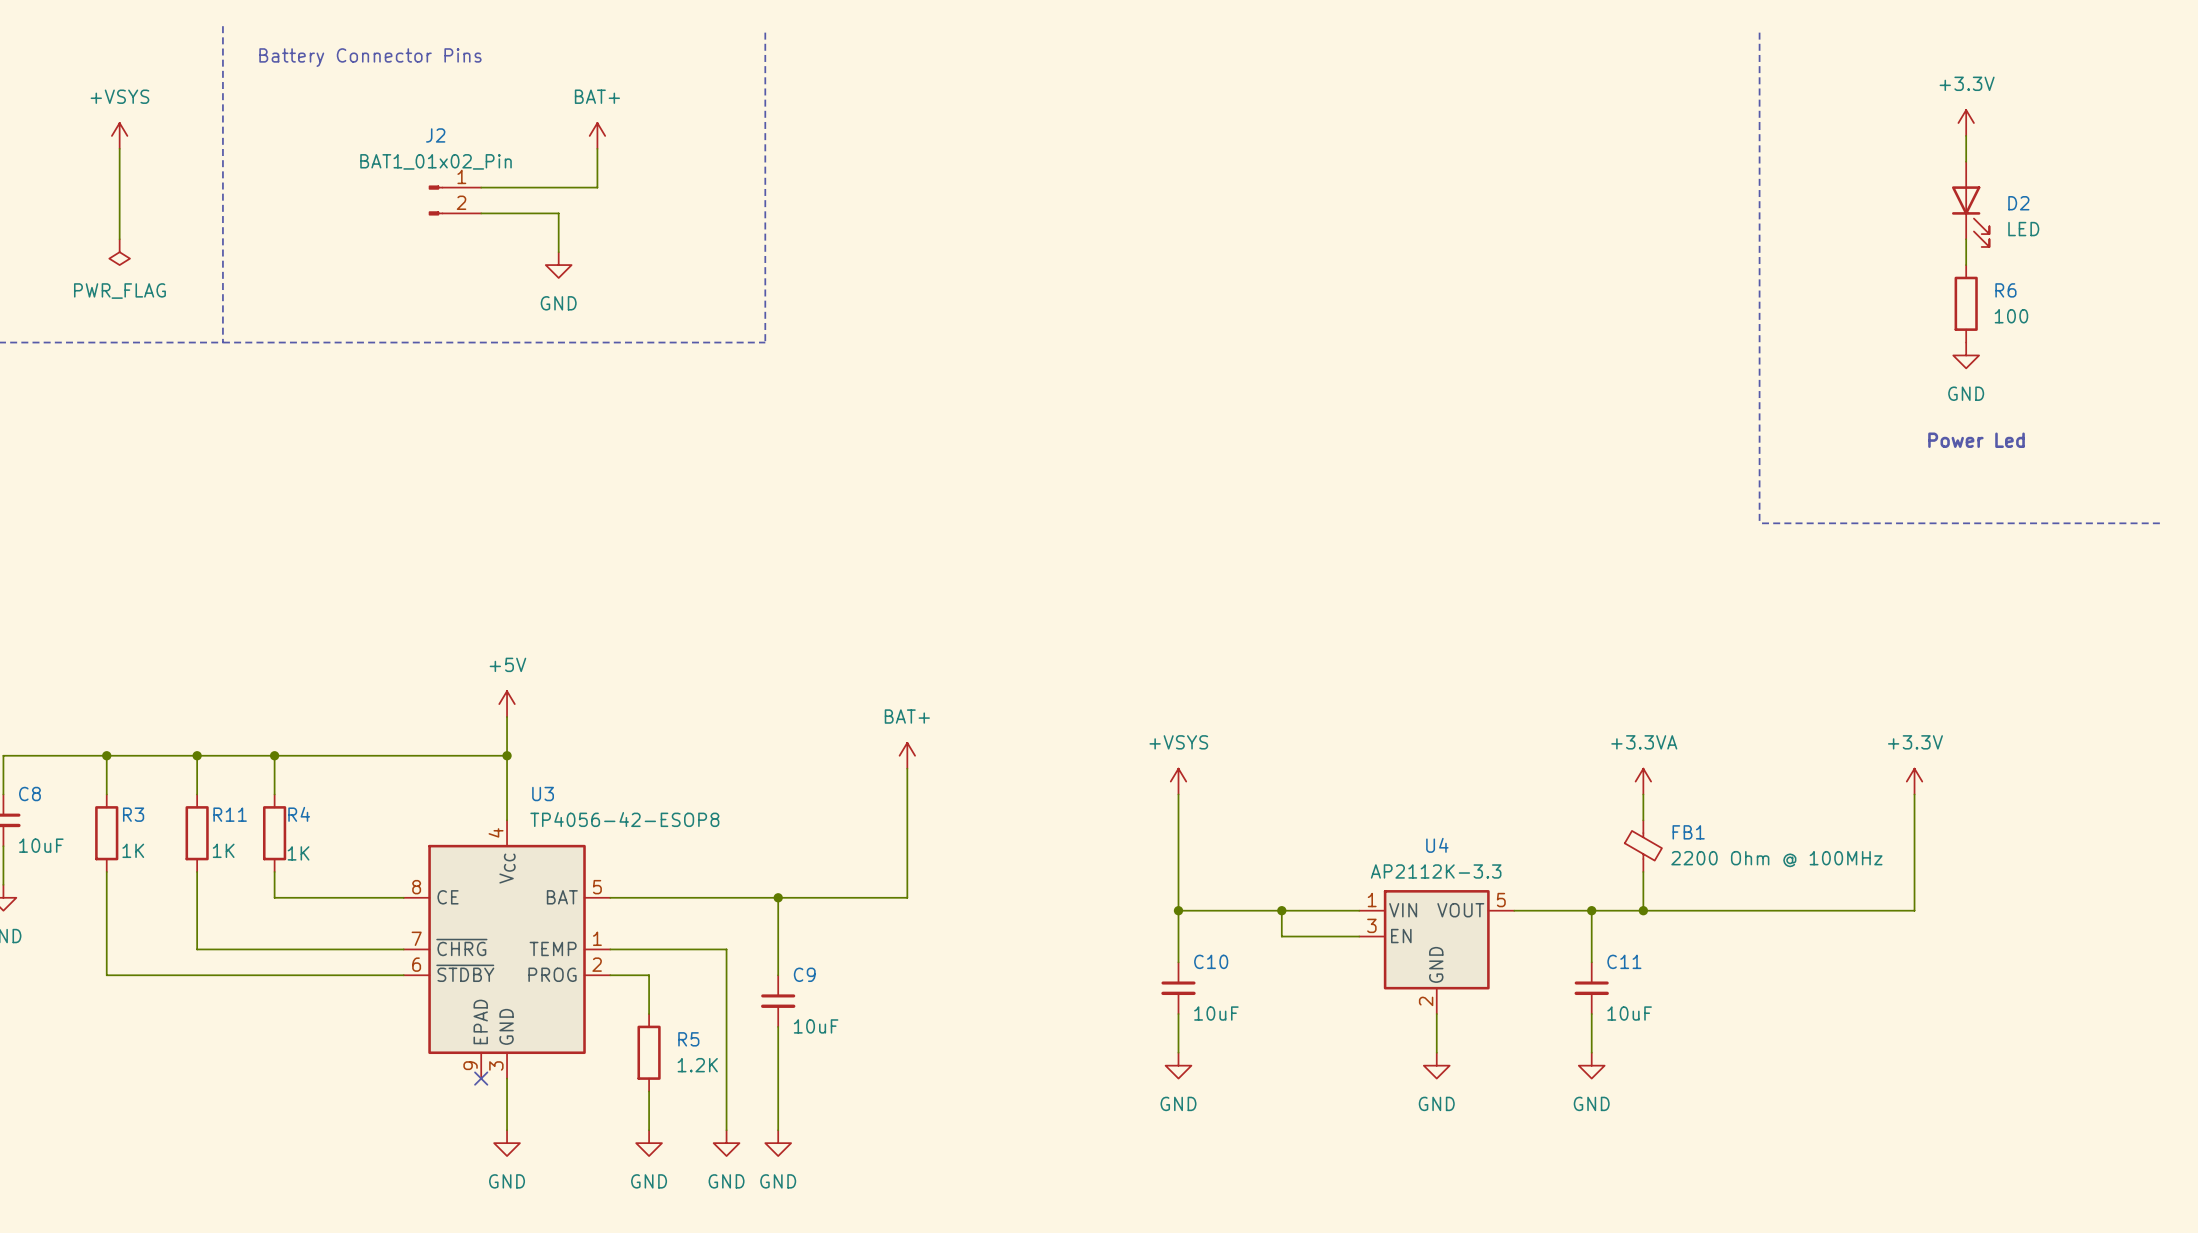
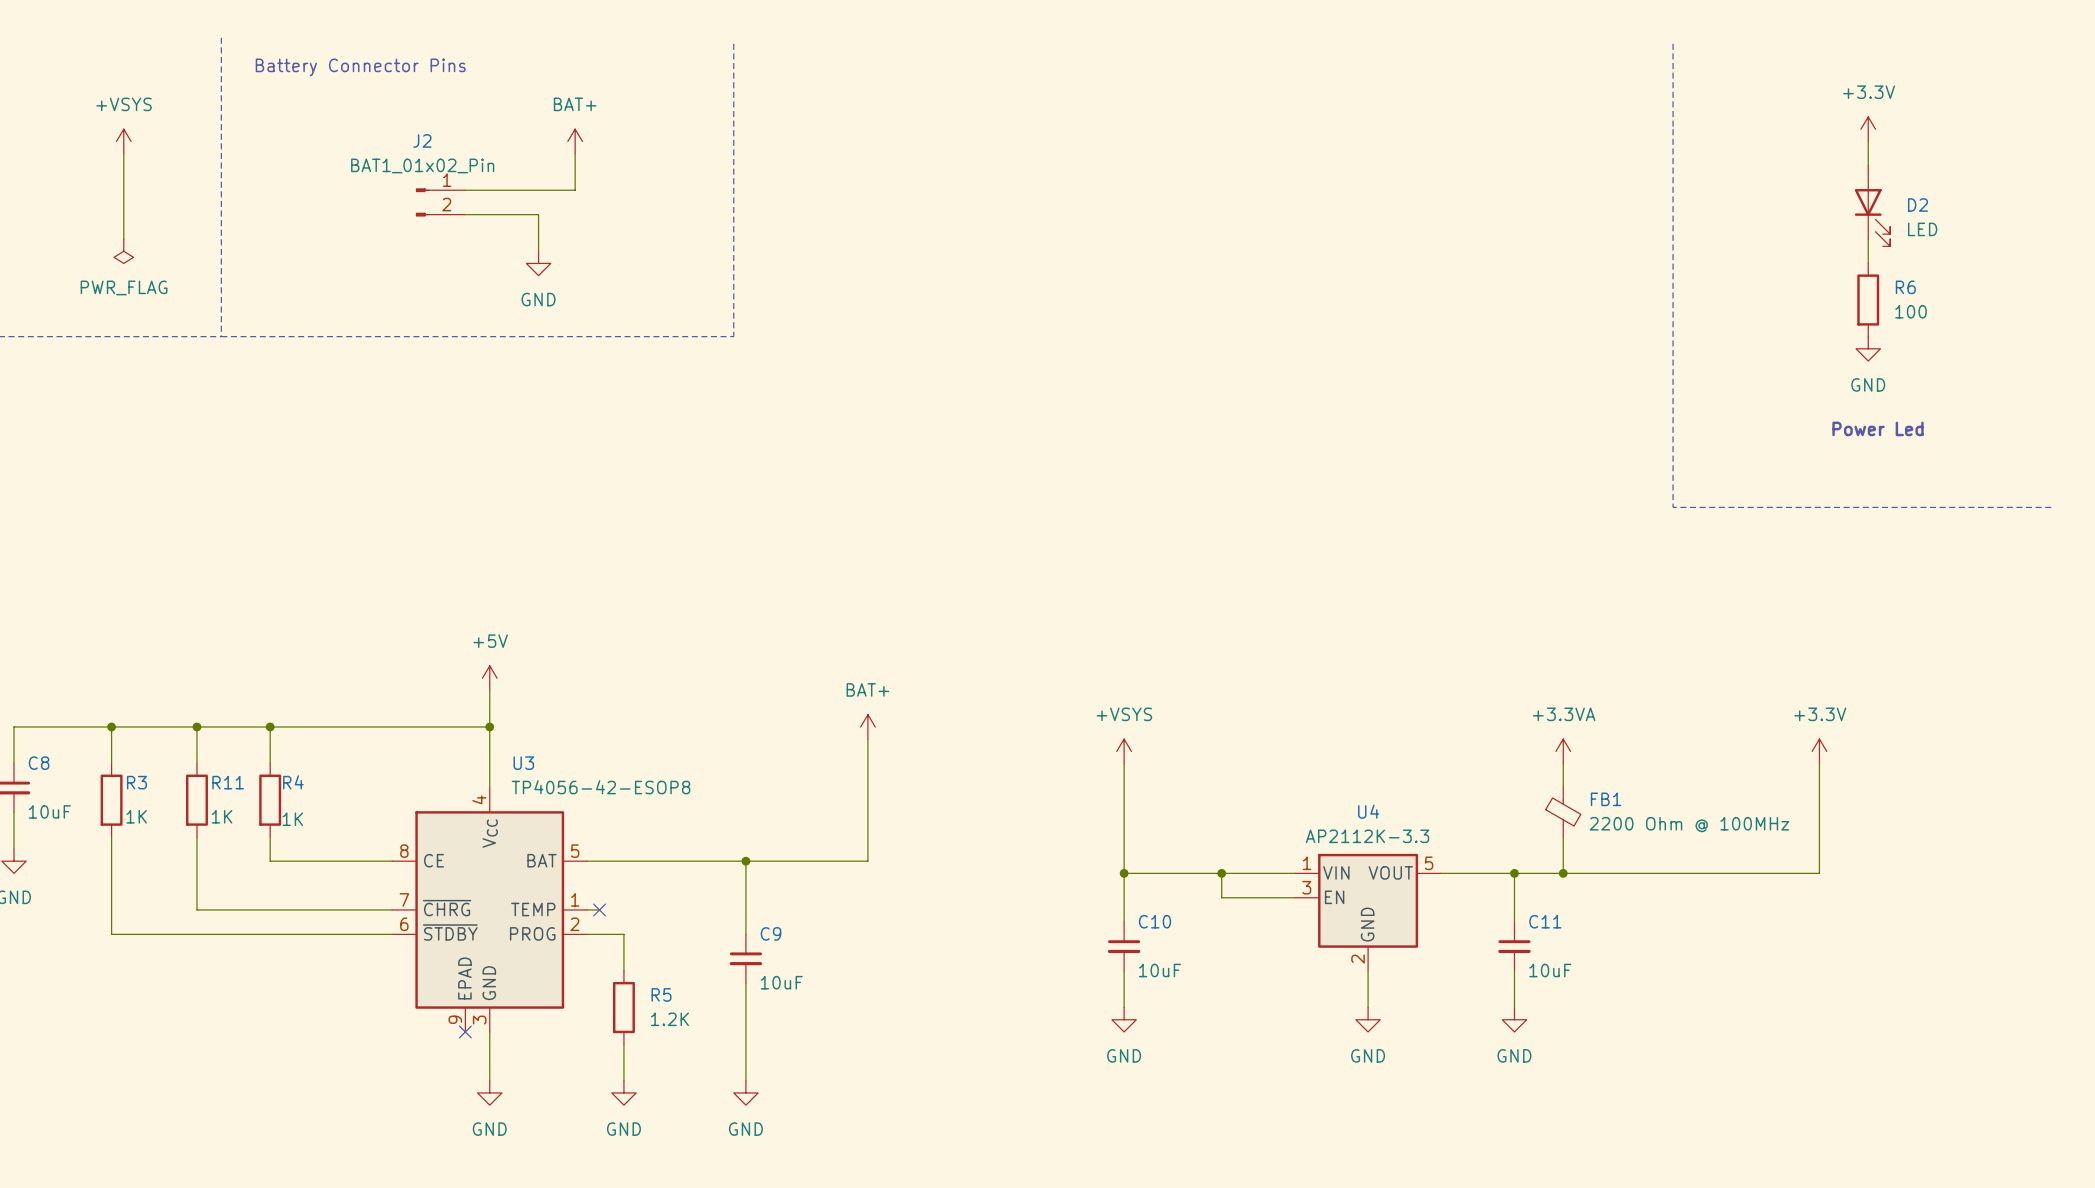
wire: (623, 949) (726, 949) (726, 1130) -> none
no-connect mark: none -> (599, 909)
power symbol: GND (726, 1143) -> none

